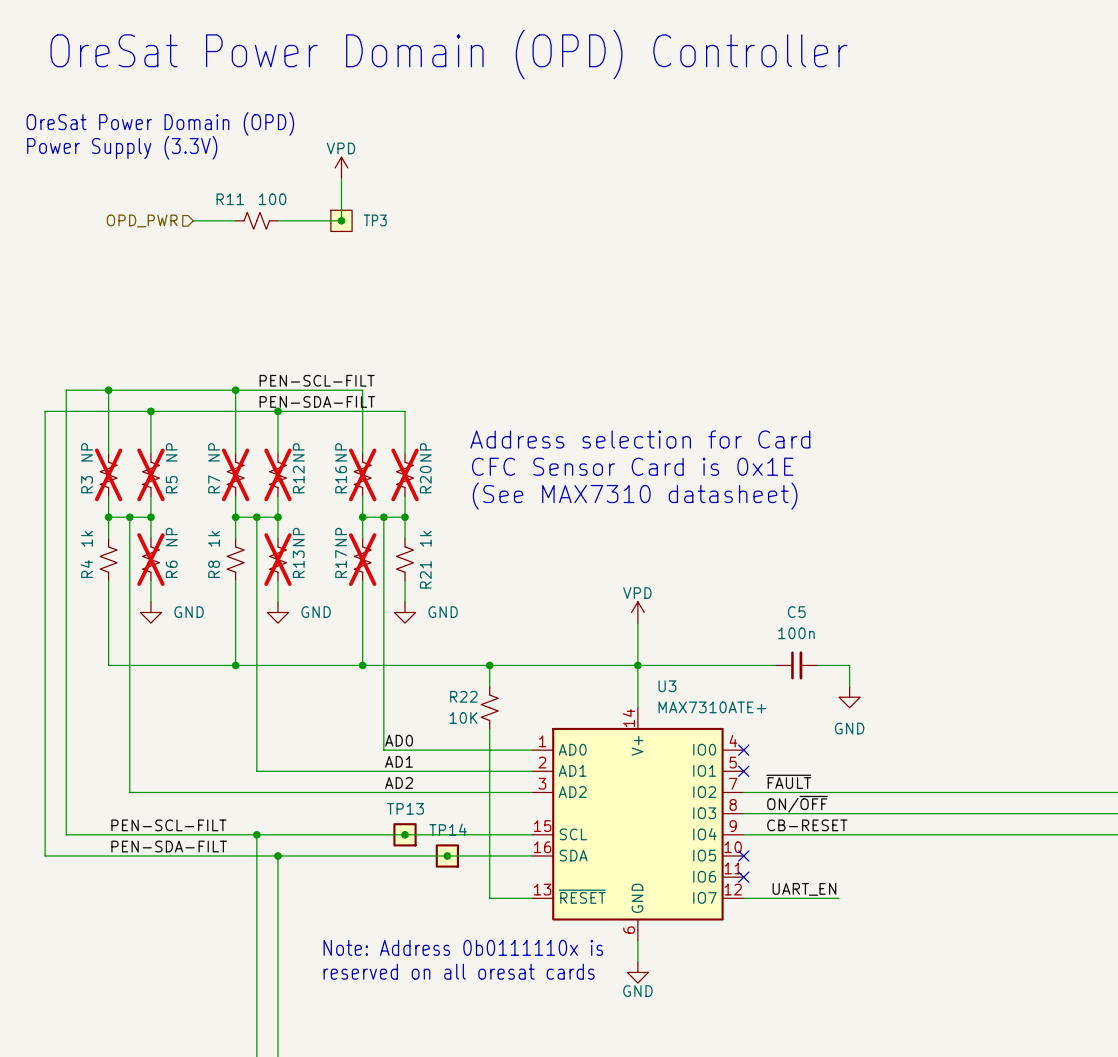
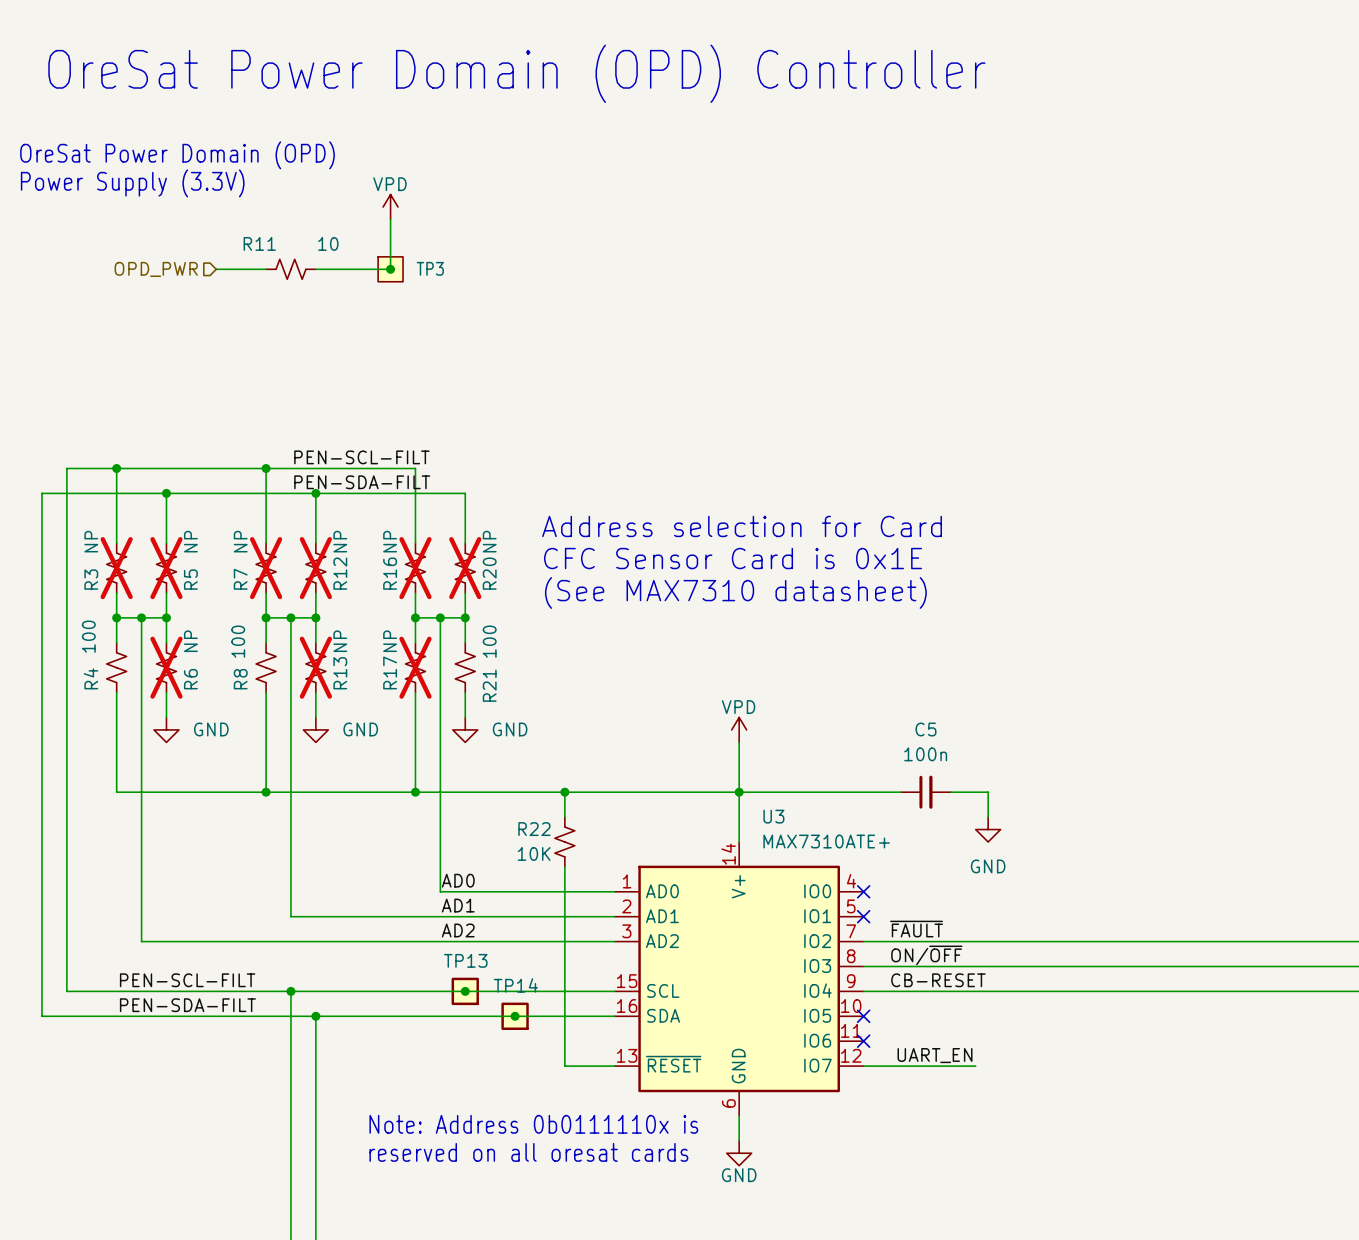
R11 value: 100 (272, 199) -> 10 (328, 243)
R4 value: 1k (87, 538) -> 100 (88, 636)
R8 value: 1k (214, 538) -> 100 (238, 641)
R21 value: 1k (425, 538) -> 100 (489, 641)

